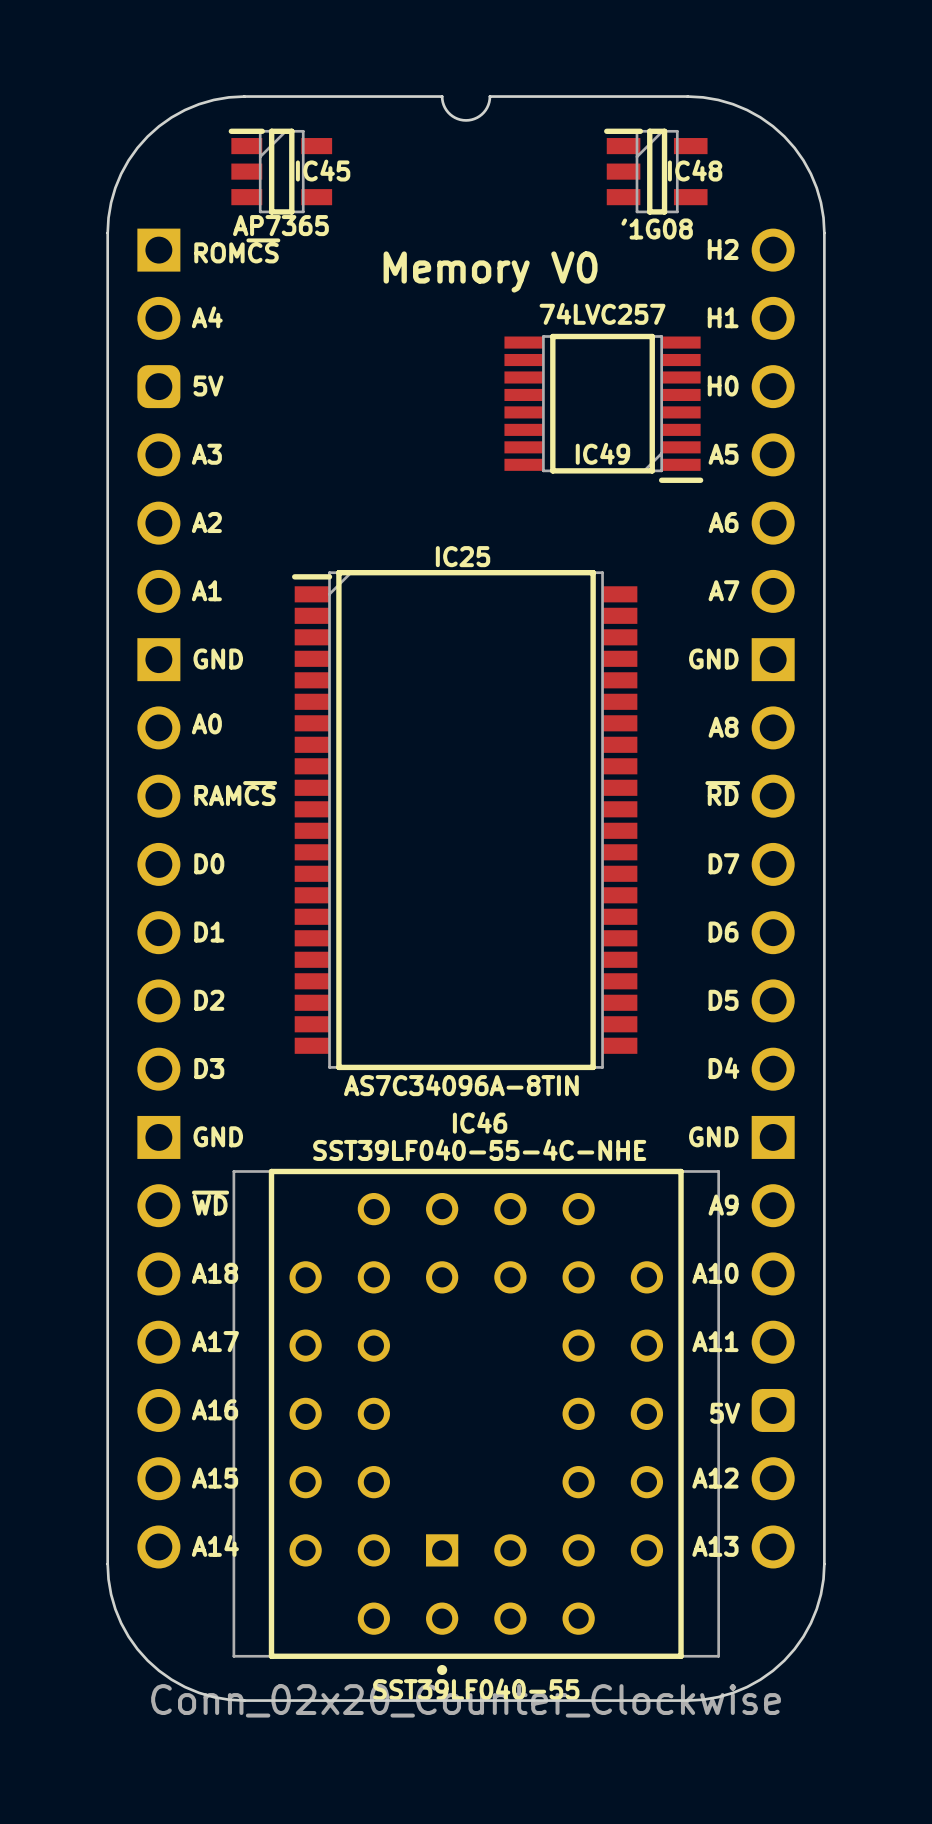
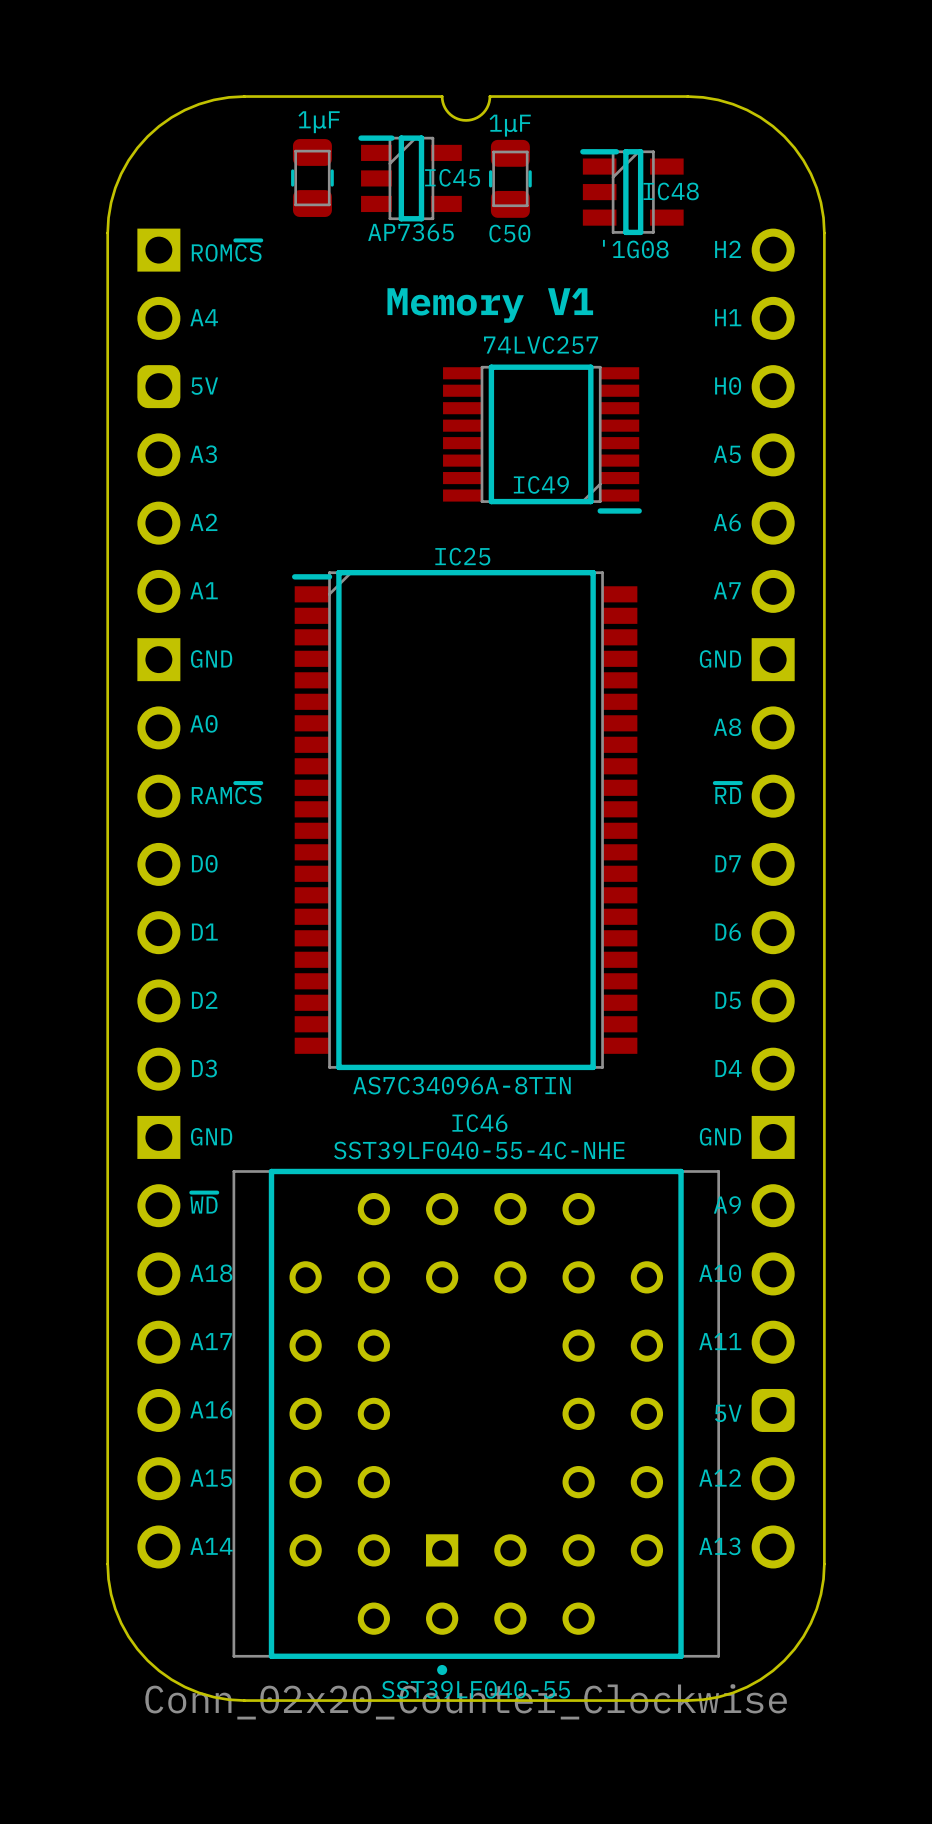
IC45 position: (280, 171) -> (410, 178)
IC48 position: (655, 171) -> (631, 192)
part: none -> 1μF (312, 178)
C50: none -> 1μF (510, 178)
text: Memory V0 (490, 271) -> Memory V1 (490, 305)
IC49 position: (603, 408) -> (542, 439)

